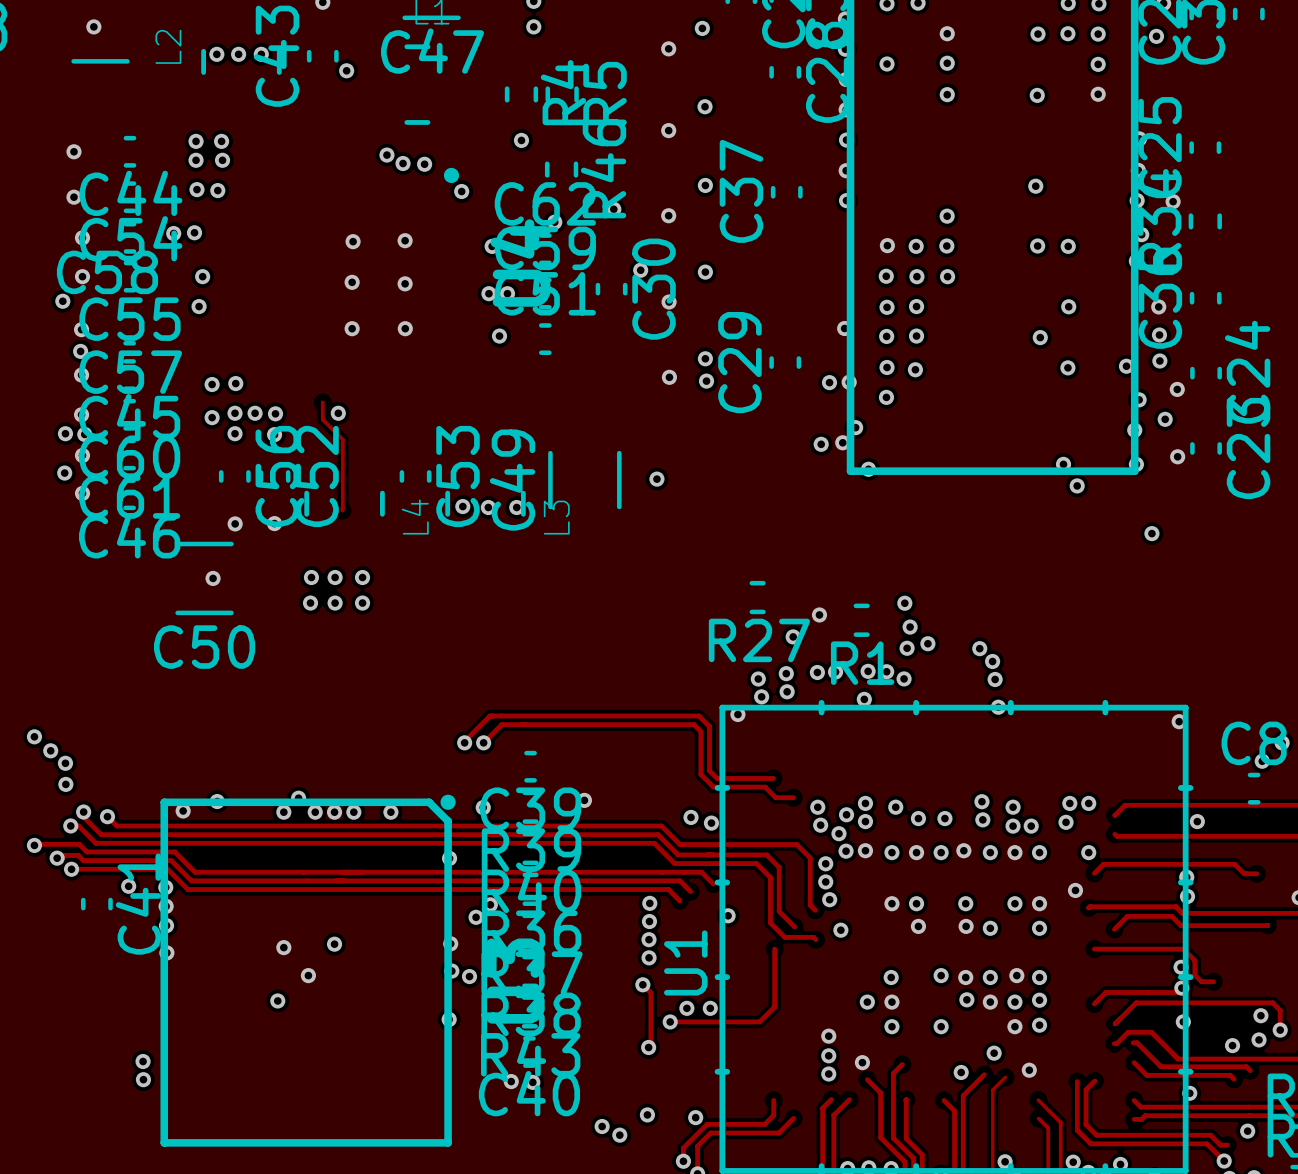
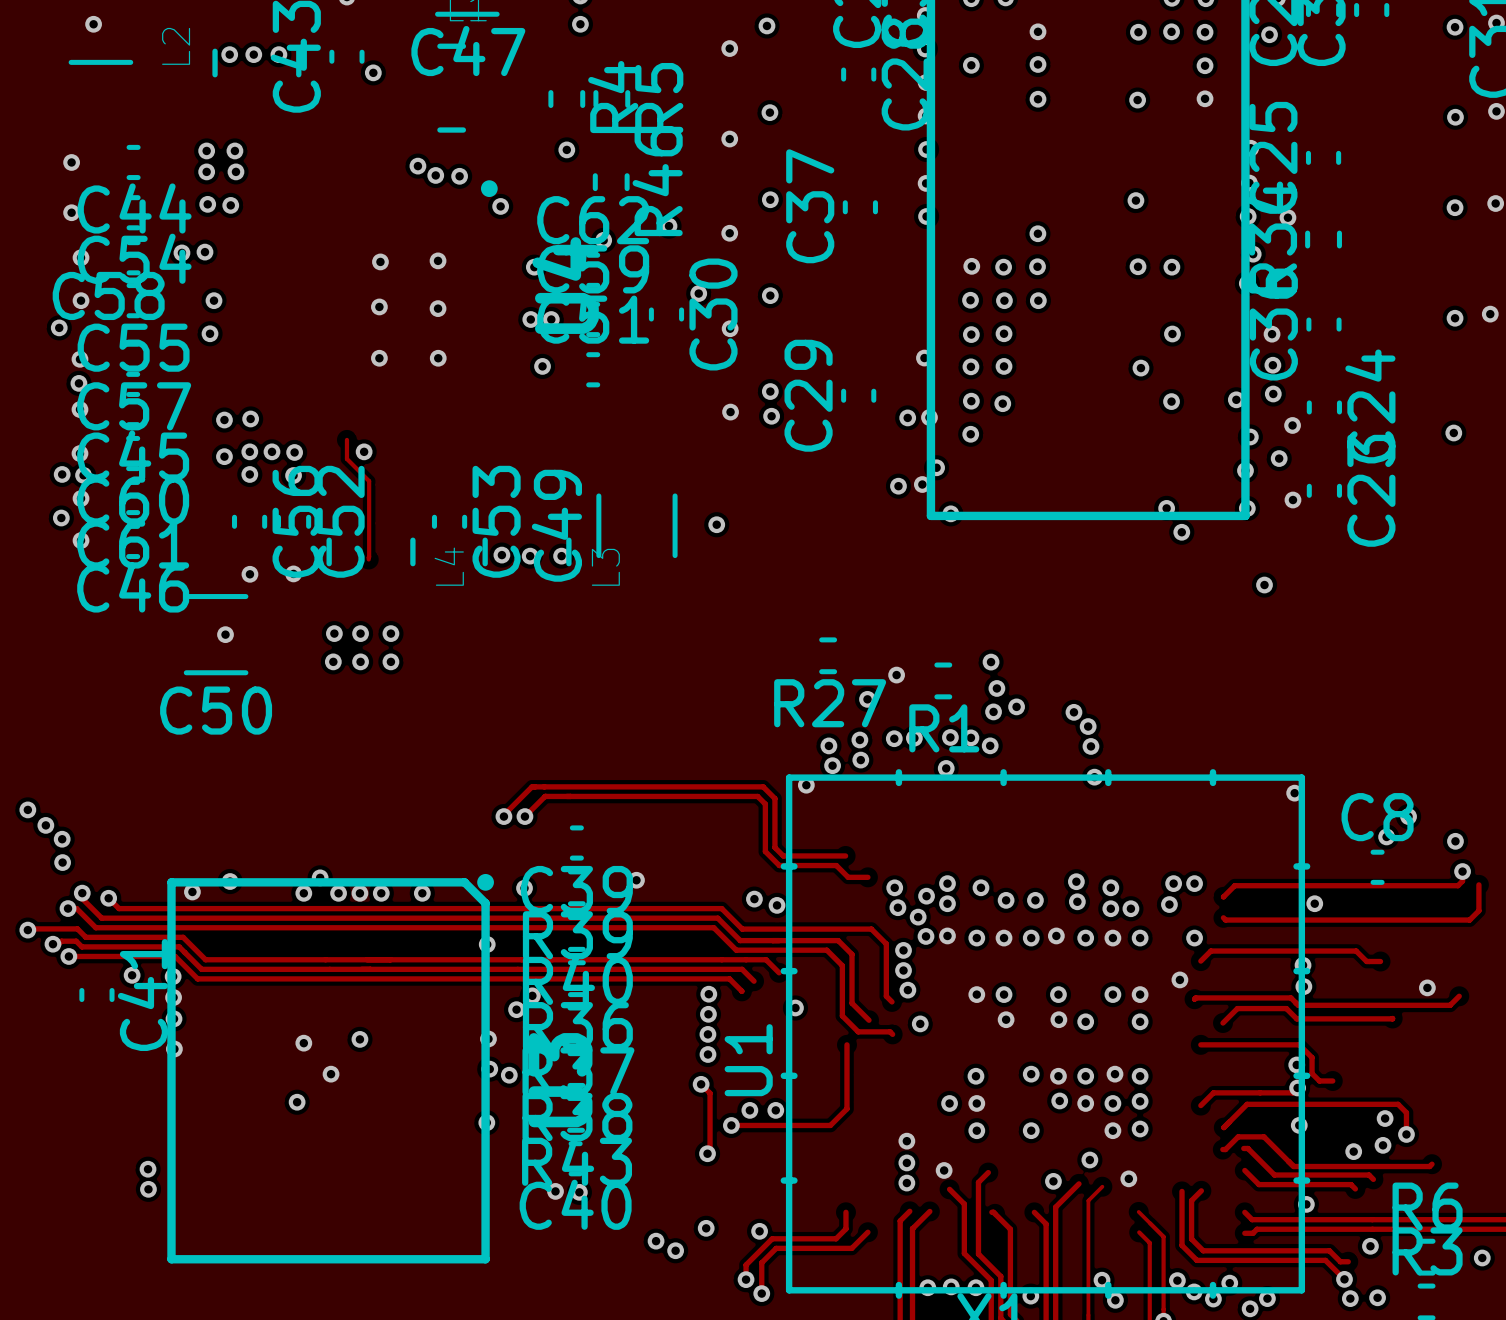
track: (905, 1100) (906, 1138) (922, 1154) -> (991, 1212) (1010, 1229) (1010, 1272)

